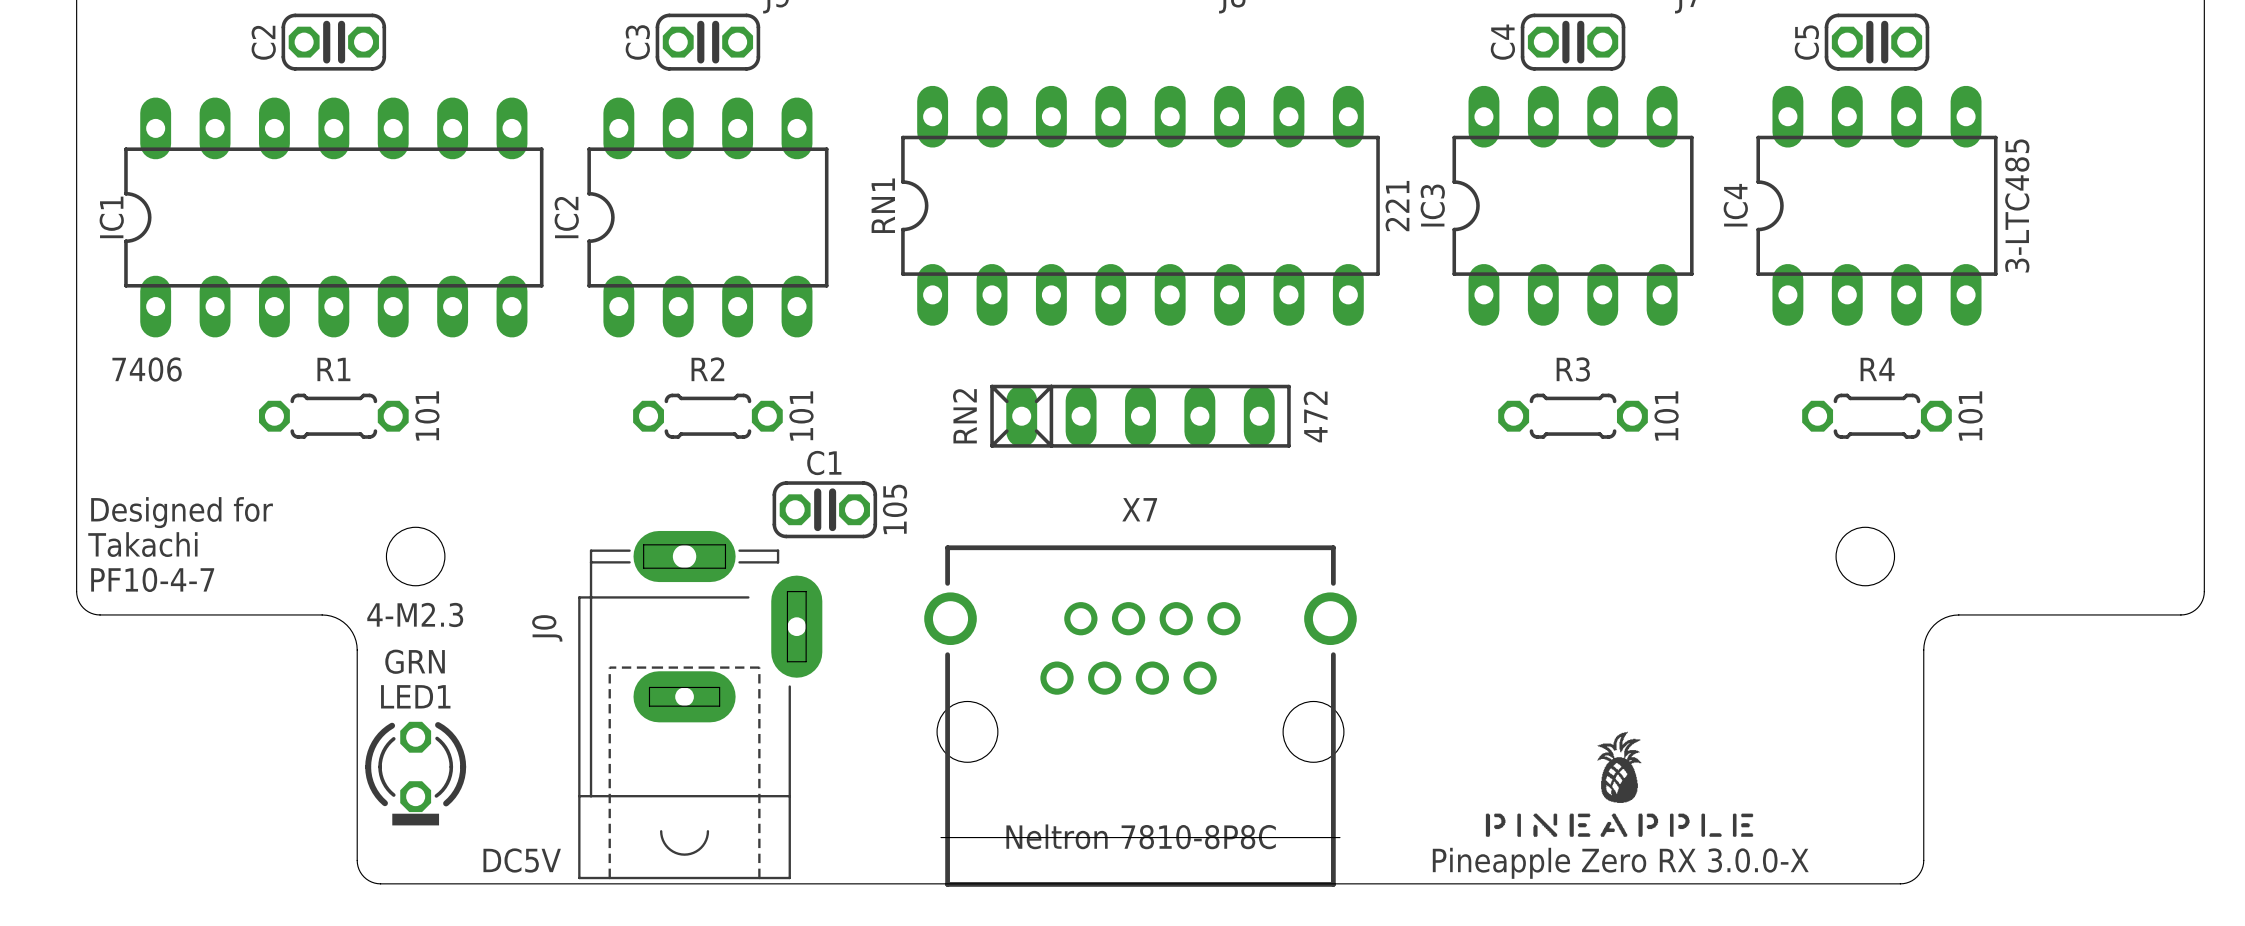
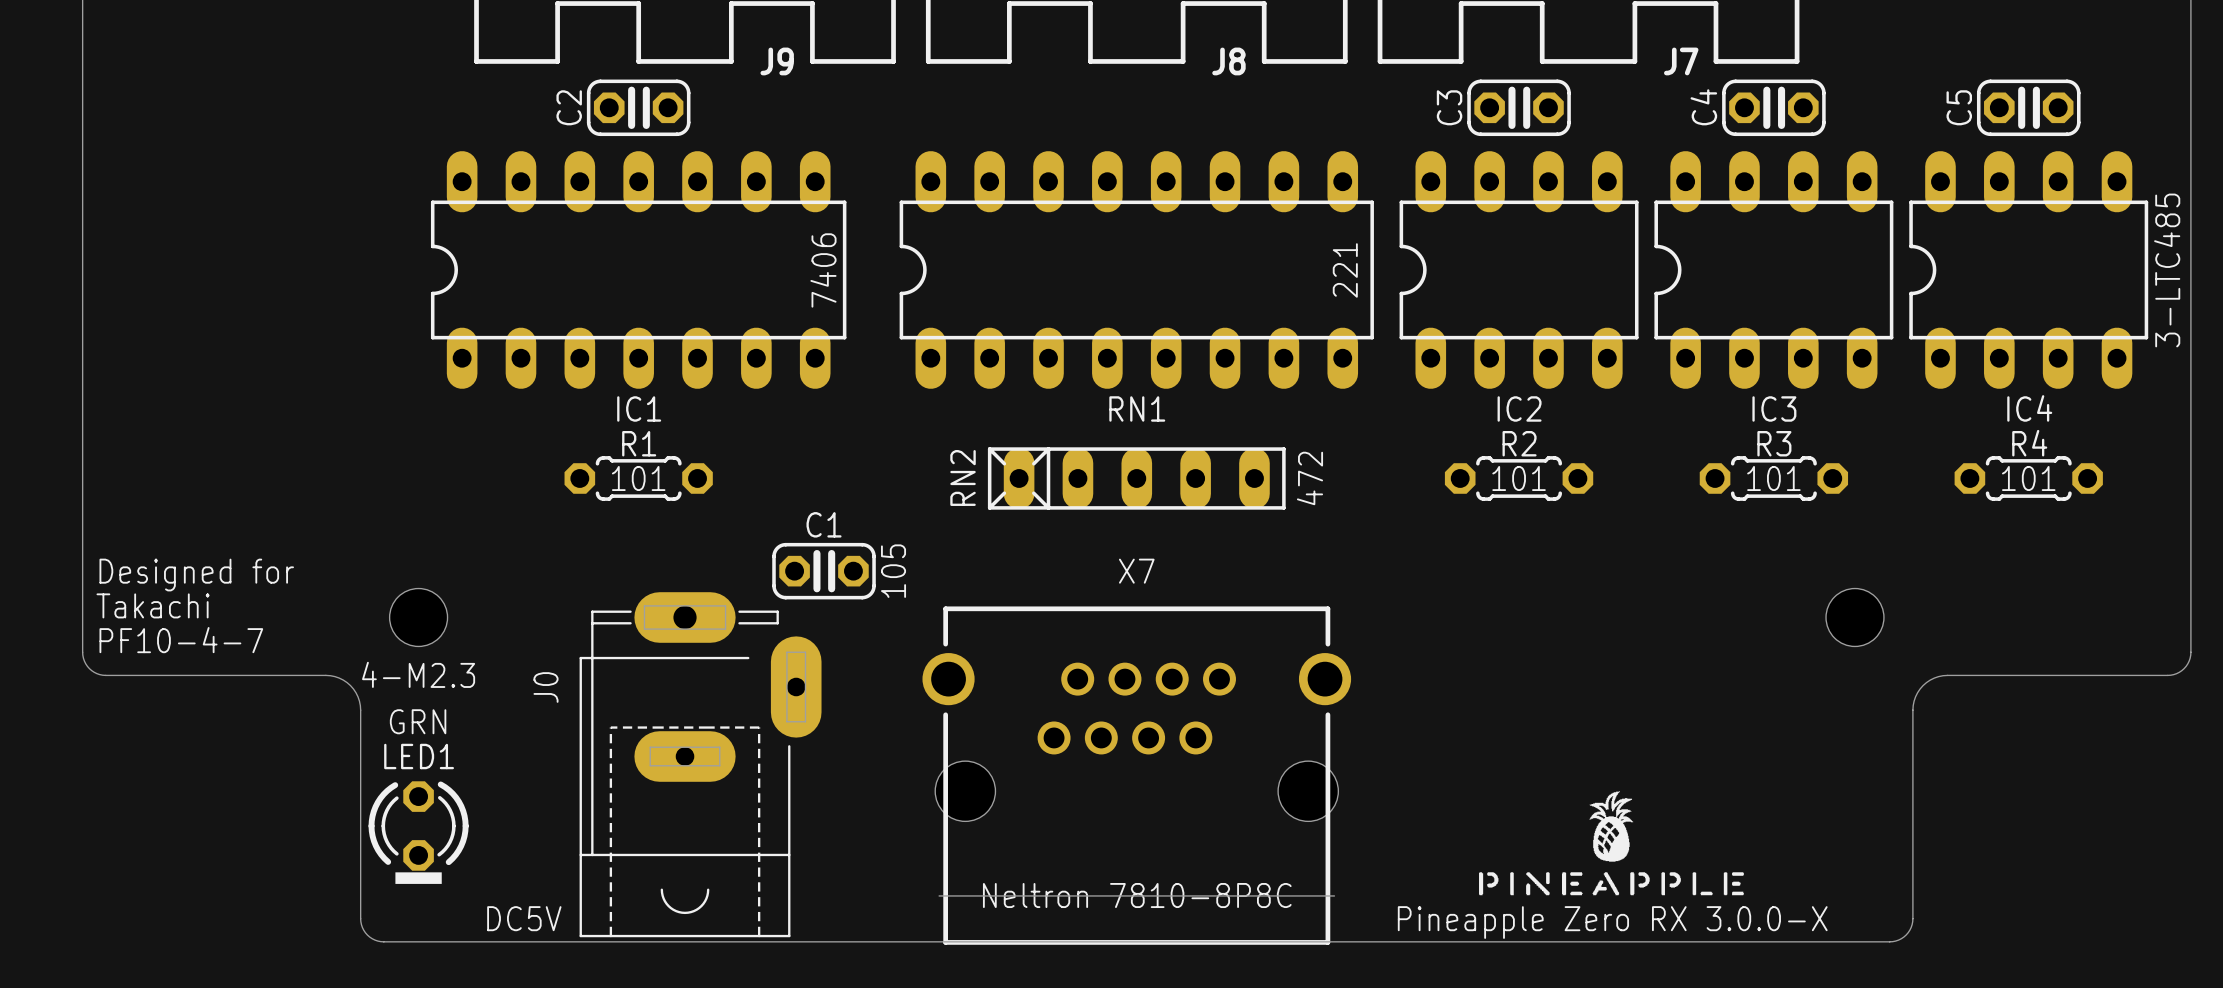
C2 position: (333, 42) -> (638, 107)
C3 position: (707, 42) -> (1519, 107)
C4 position: (1573, 42) -> (1773, 107)
C5 position: (1876, 42) -> (2028, 107)
text: none -> 7406 (823, 270)
RN1 name rotation: 0° (883, 205) -> 90° clockwise (1137, 408)
RN1 name position: RN1 (883, 205) -> RN1 (1137, 408)
IC3 name rotation: 0° (1432, 205) -> 90° clockwise (1774, 408)
IC3 name position: IC3 (1432, 205) -> IC3 (1774, 408)
IC3 position: (1573, 205) -> (1773, 269)
IC4 name rotation: 0° (1735, 205) -> 90° clockwise (2029, 408)
IC4 name position: IC4 (1735, 205) -> IC4 (2029, 408)
IC4 position: (1876, 205) -> (2028, 269)
text position: 3-LTC485 (2017, 205) -> 3-LTC485 (2167, 270)
text position: 221 (1397, 206) -> 221 (1345, 270)
IC1 name rotation: 0° (111, 217) -> 90° clockwise (639, 408)
IC1 name position: IC1 (111, 217) -> IC1 (639, 408)
IC1 position: (333, 217) -> (638, 269)
IC2 name rotation: 0° (566, 217) -> 90° clockwise (1519, 408)
IC2 name position: IC2 (566, 217) -> IC2 (1519, 408)
IC2 position: (707, 217) -> (1519, 269)
text: 7406 (147, 369) -> none
R1 name position: R1 (333, 369) -> R1 (639, 443)
R2 name position: R2 (707, 369) -> R2 (1519, 443)
R3 name position: R3 (1573, 369) -> R3 (1774, 443)
R4 name position: R4 (1877, 369) -> R4 (2029, 443)
text: 101 (427, 415) -> none
text: 101 (801, 415) -> none
text: 101 (1666, 415) -> none
text rotation: 0° (1970, 415) -> 90° clockwise (2028, 478)
R1 position: (333, 416) -> (638, 478)
text: none -> 101 (638, 478)
R2 position: (707, 416) -> (1519, 478)
text: none -> 101 (1519, 478)
R3 position: (1573, 416) -> (1773, 478)
text: none -> 101 (1773, 478)
R4 position: (1876, 416) -> (2028, 478)

